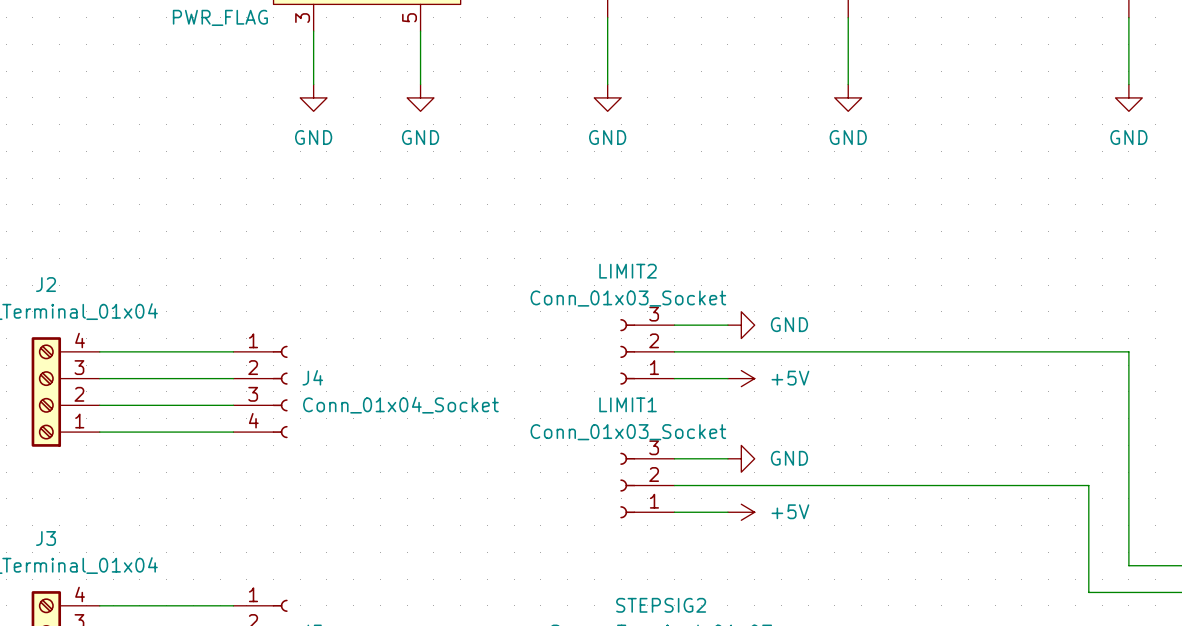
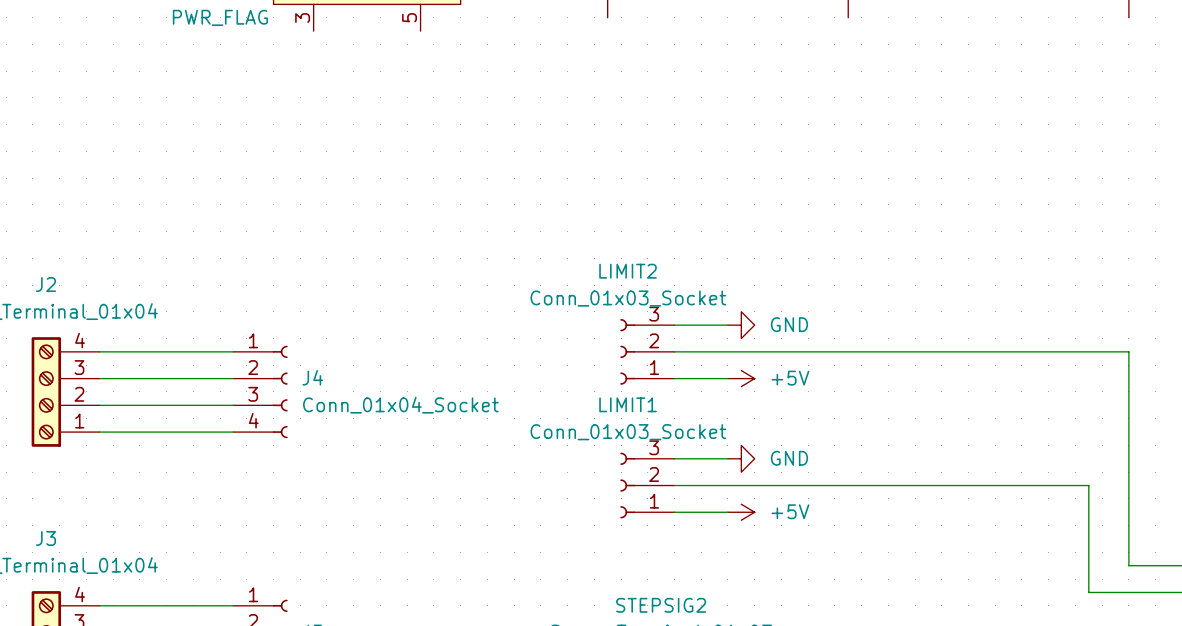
wire: (607, 17) (607, 84) -> none
wire: (848, 17) (848, 84) -> none
wire: (1128, 17) (1128, 84) -> none
wire: (313, 31) (313, 84) -> none
wire: (420, 31) (420, 84) -> none
power symbol: GND (313, 97) -> none
power symbol: GND (420, 97) -> none
power symbol: GND (607, 97) -> none
power symbol: GND (848, 97) -> none
power symbol: GND (1128, 97) -> none

